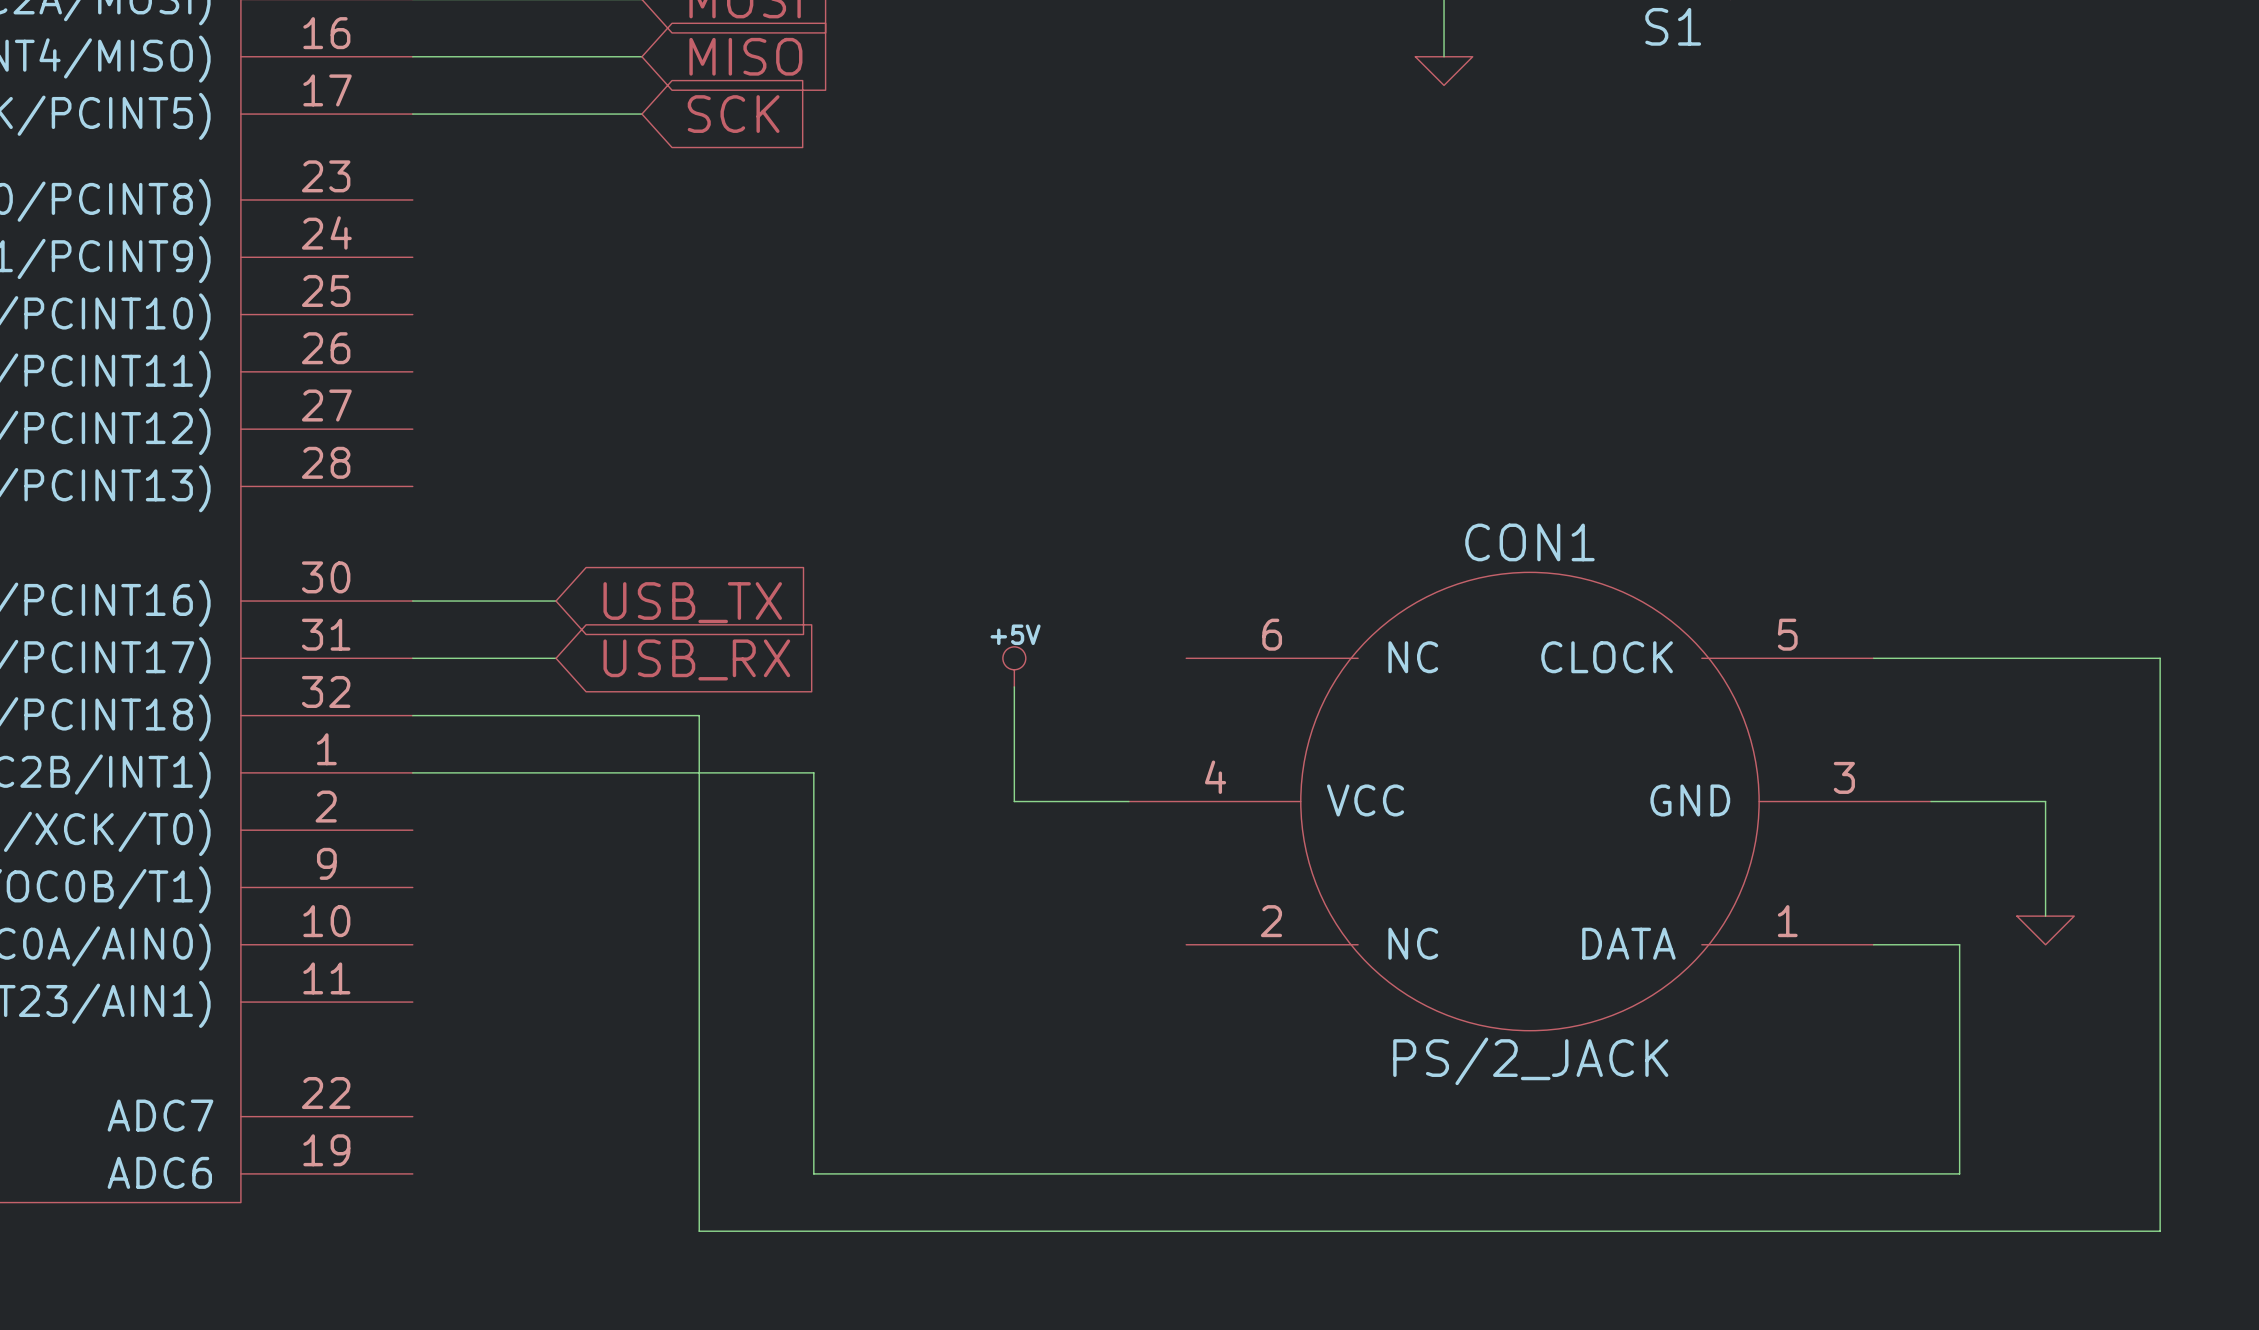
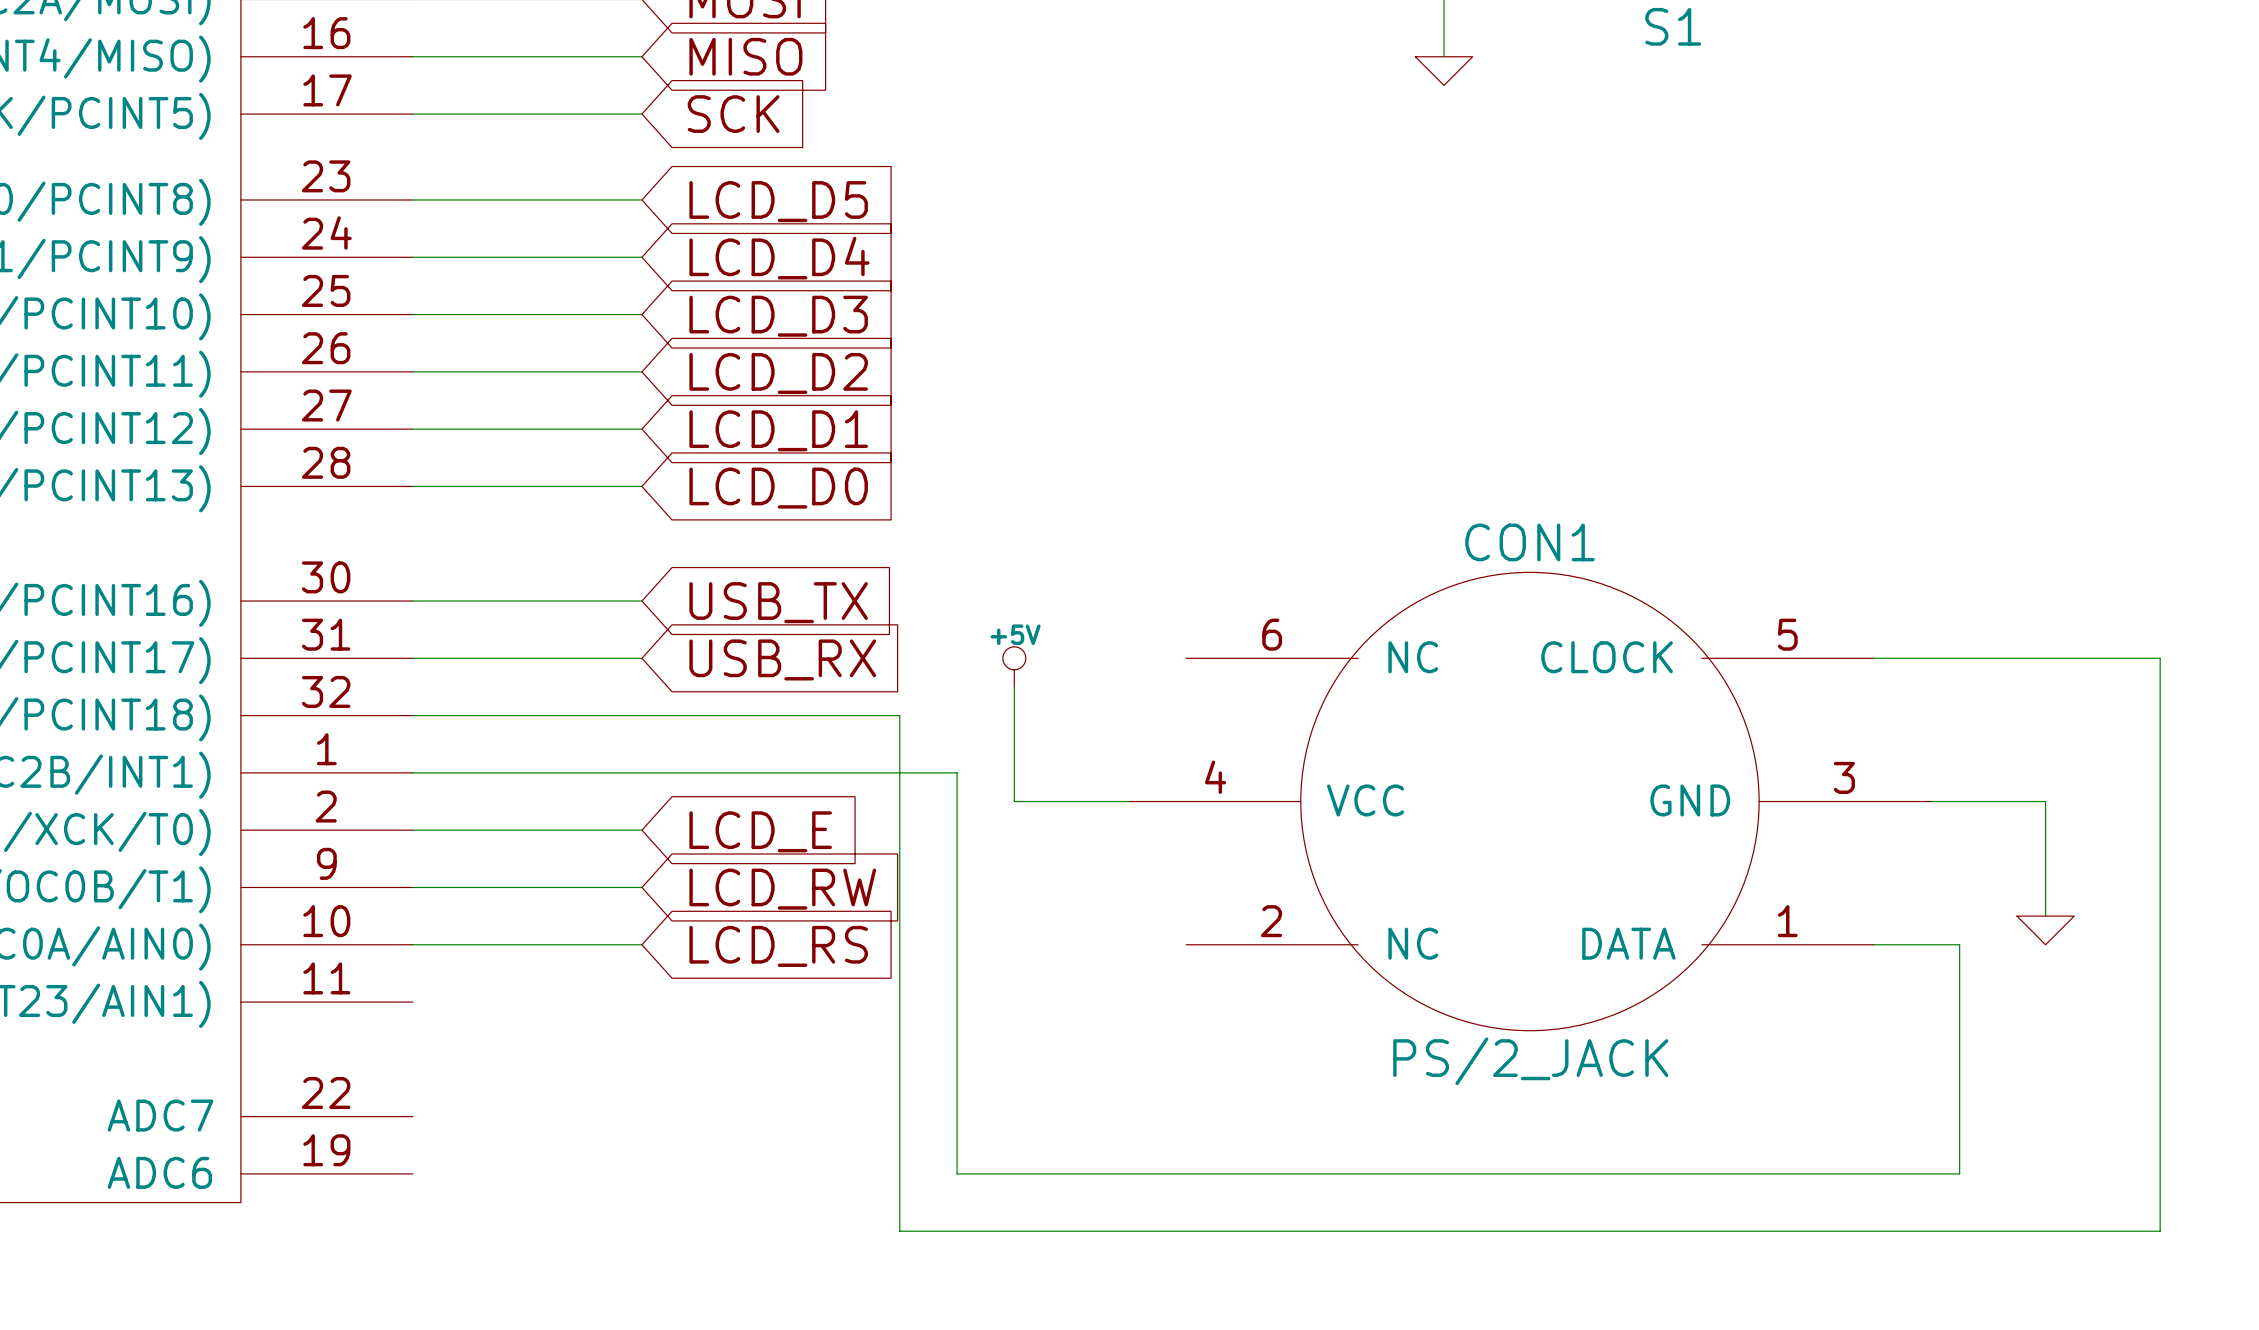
wire: none -> (412, 199) (641, 199)
global label: none -> LCD_D5 (778, 201)
wire: none -> (412, 257) (641, 257)
global label: none -> LCD_D4 (779, 258)
wire: none -> (412, 314) (641, 314)
global label: none -> LCD_D3 (778, 316)
wire: none -> (412, 371) (641, 371)
global label: none -> LCD_D2 (778, 373)
wire: none -> (412, 429) (641, 429)
global label: none -> LCD_D1 (778, 430)
wire: none -> (412, 486) (641, 486)
global label: none -> LCD_D0 (778, 488)
wire: none -> (556, 601) (641, 601)
global label position: USB_TX (692, 602) -> USB_TX (778, 602)
wire: none -> (556, 658) (641, 658)
global label position: USB_RX (696, 659) -> USB_RX (782, 659)
wire: (699, 715) (699, 1231) (899, 1231) -> (699, 715) (899, 715) (899, 1231)
wire: (813, 772) (813, 1173) (957, 1173) -> (813, 772) (957, 772) (957, 1173)
wire: none -> (412, 830) (641, 830)
global label: none -> LCD_E (760, 831)
wire: none -> (412, 887) (641, 887)
global label: none -> LCD_RW (782, 889)
wire: none -> (412, 944) (641, 944)
global label: none -> LCD_RS (778, 946)

